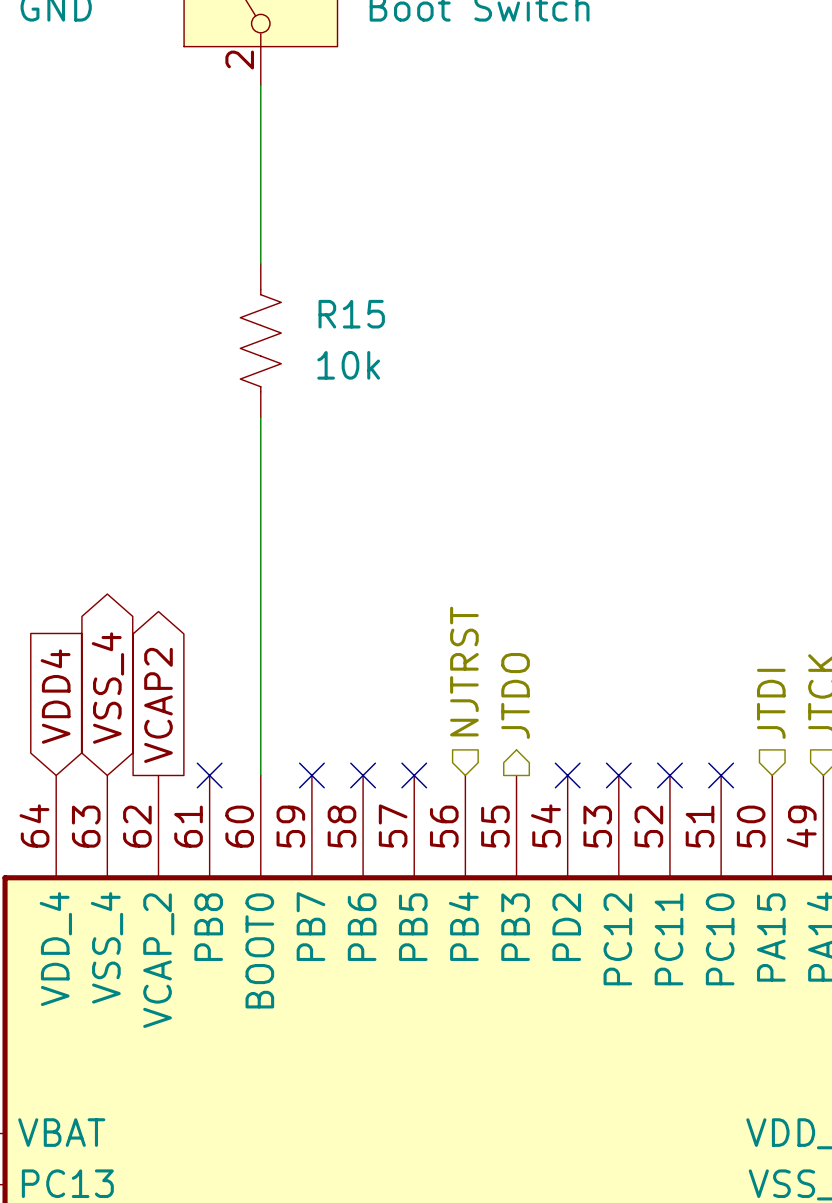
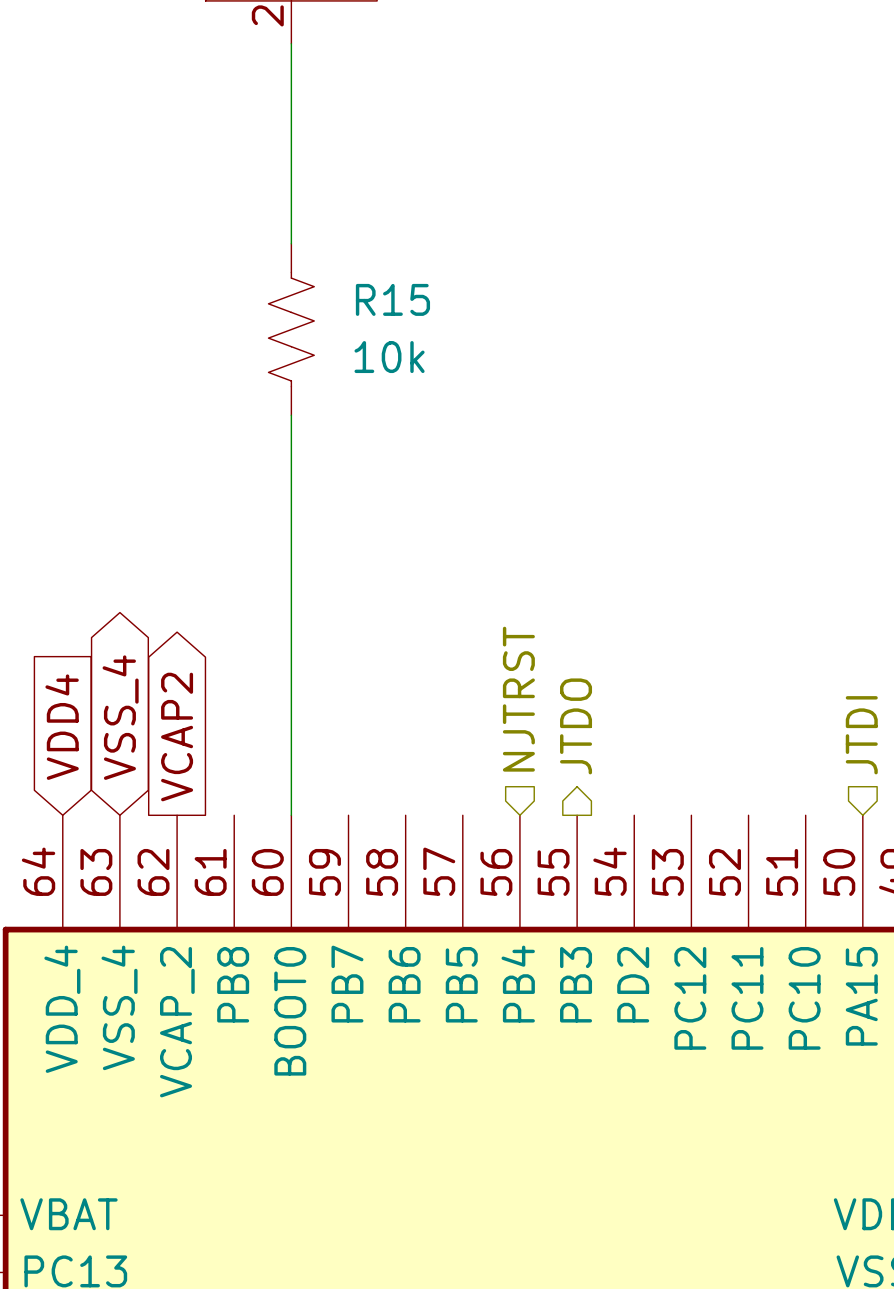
no-connect mark: (209, 775) -> none
no-connect mark: (311, 775) -> none
no-connect mark: (363, 775) -> none
no-connect mark: (414, 775) -> none
no-connect mark: (567, 775) -> none
no-connect mark: (618, 775) -> none
no-connect mark: (669, 775) -> none
no-connect mark: (721, 775) -> none

